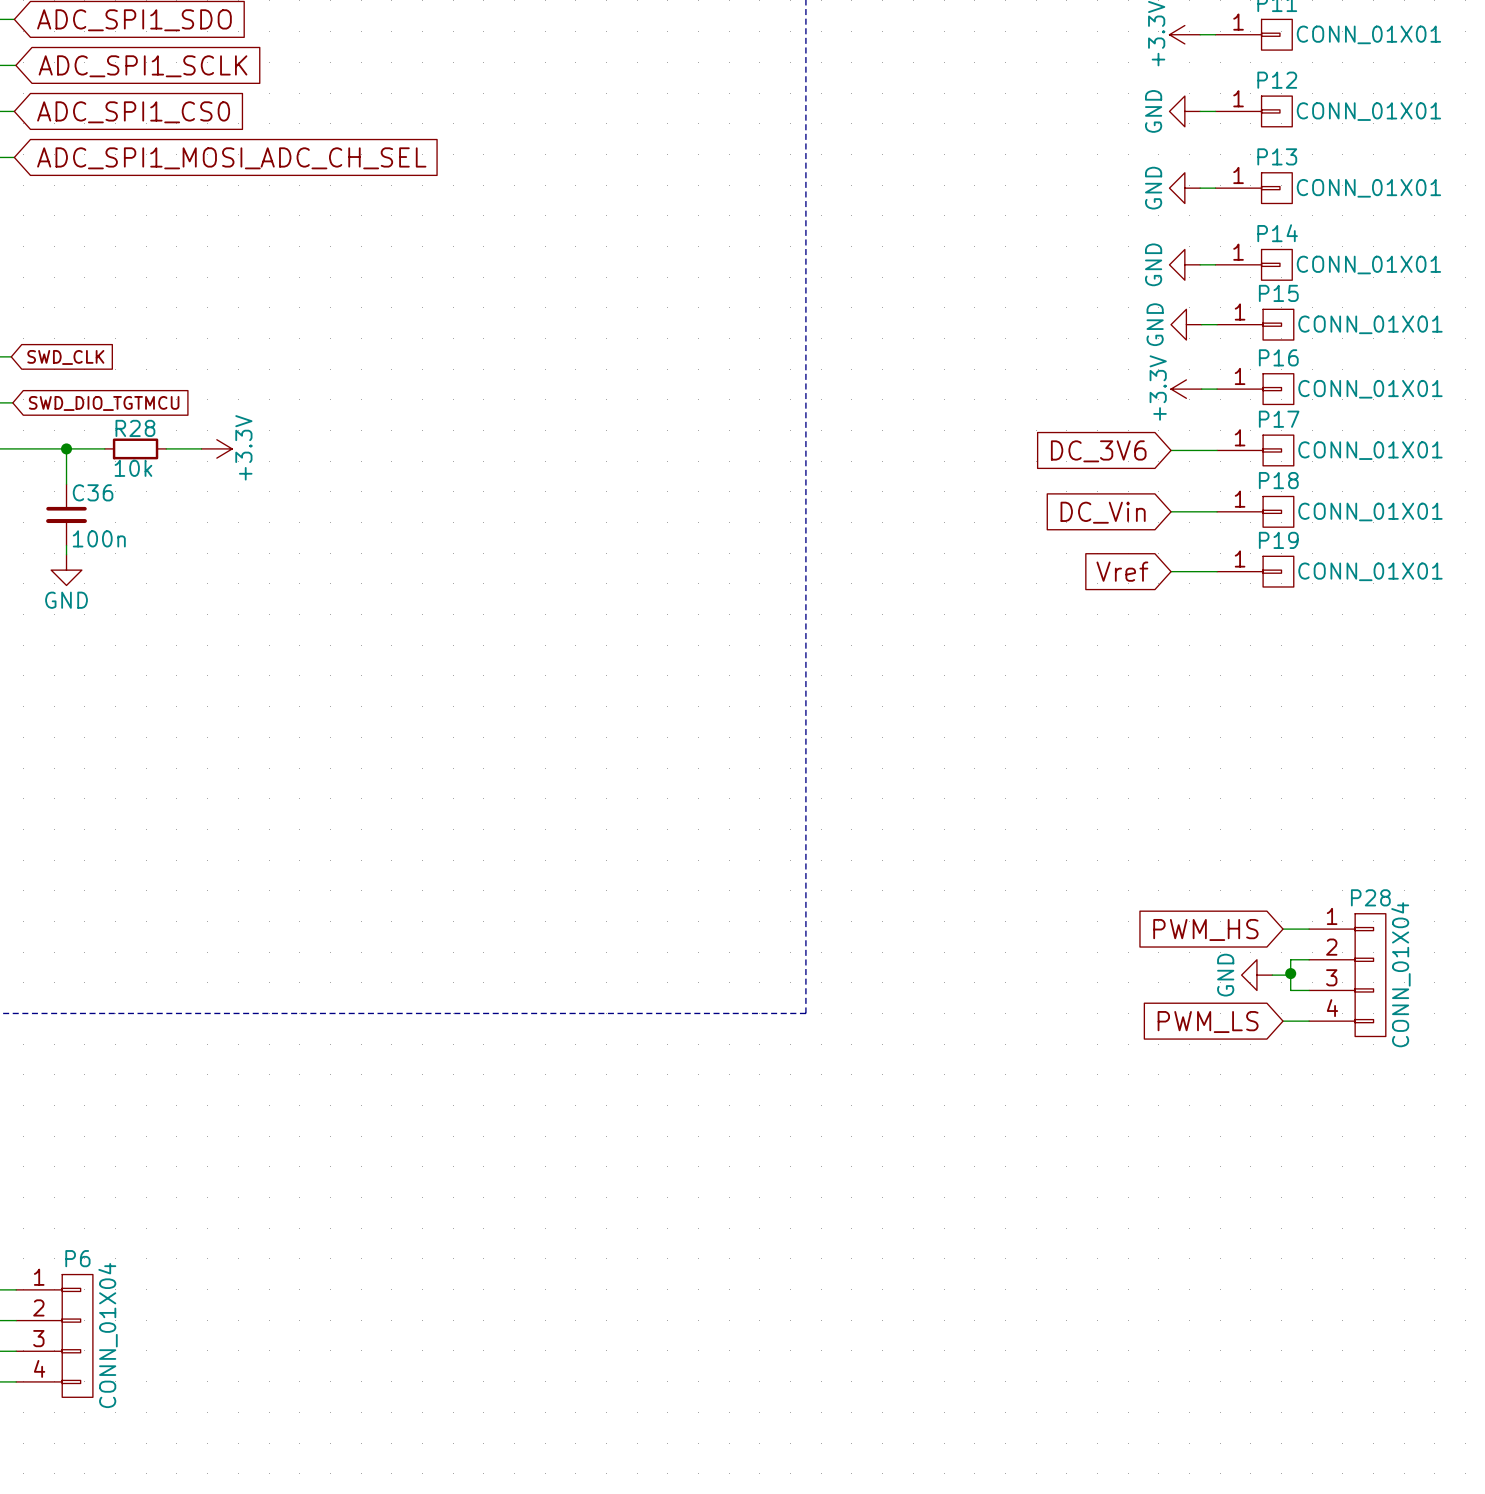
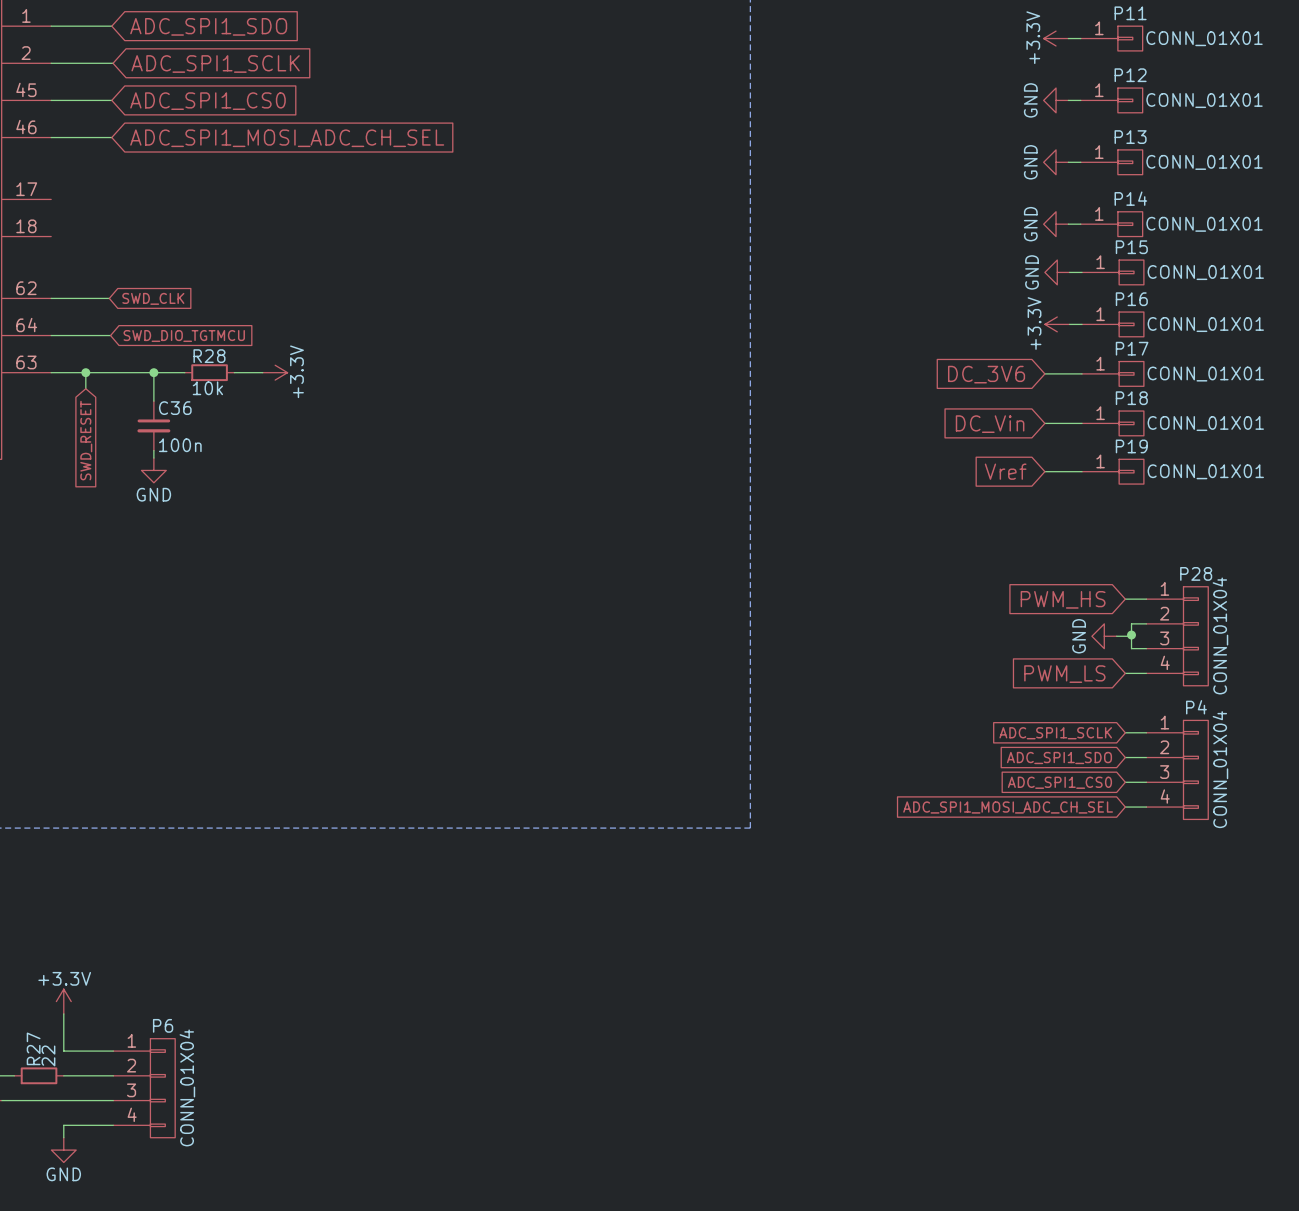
junction: none -> (1131, 635)
global label: none -> ADC_SPI1_SCLK (1055, 733)
wire: none -> (1125, 732) (1146, 732)
global label: none -> ADC_SPI1_SDO (1059, 758)
wire: none -> (1125, 757) (1146, 757)
global label position: PWM_HS (1205, 929) -> PWM_HS (1063, 599)
wire: (1283, 929) (1309, 929) -> (1125, 599) (1146, 599)
P4: none -> CONN_01X04 (1177, 769)
wire: none -> (1125, 782) (1146, 782)
global label: none -> ADC_SPI1_CS0 (1059, 782)
wire: (1309, 959) (1290, 959) (1290, 990) (1309, 990) -> (1146, 623) (1131, 623) (1131, 648) (1146, 648)
junction: (1290, 973) -> none
power symbol position: GND (1256, 975) -> GND (1104, 636)
wire: (1272, 975) (1290, 975) -> (1116, 636) (1131, 636)
P28 position: (1347, 975) -> (1177, 636)
global label: none -> ADC_SPI1_MOSI_ADC_CH_SEL (1008, 807)
wire: none -> (1125, 807) (1146, 807)
wire: (1283, 1021) (1309, 1021) -> (1125, 673) (1146, 673)
global label position: PWM_LS (1208, 1022) -> PWM_LS (1064, 674)

